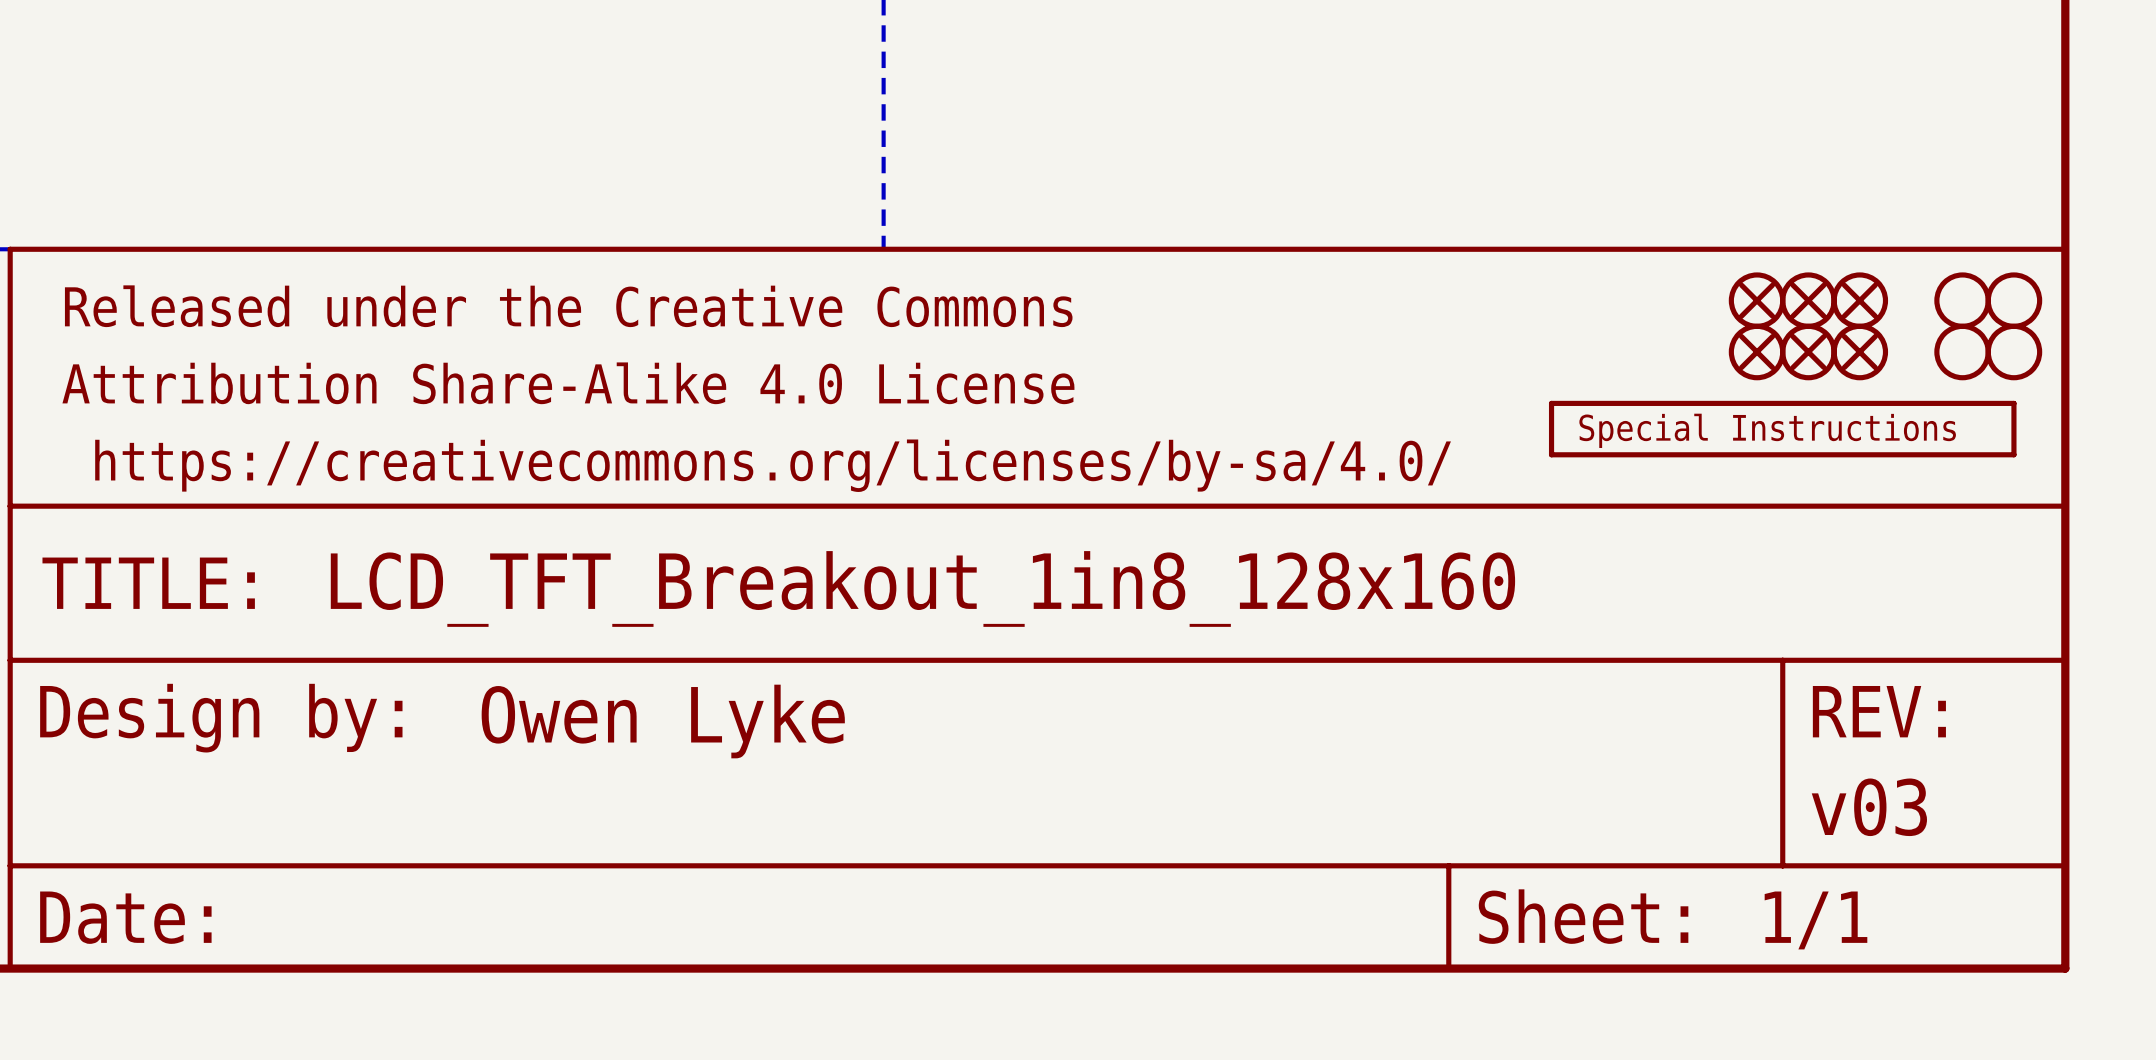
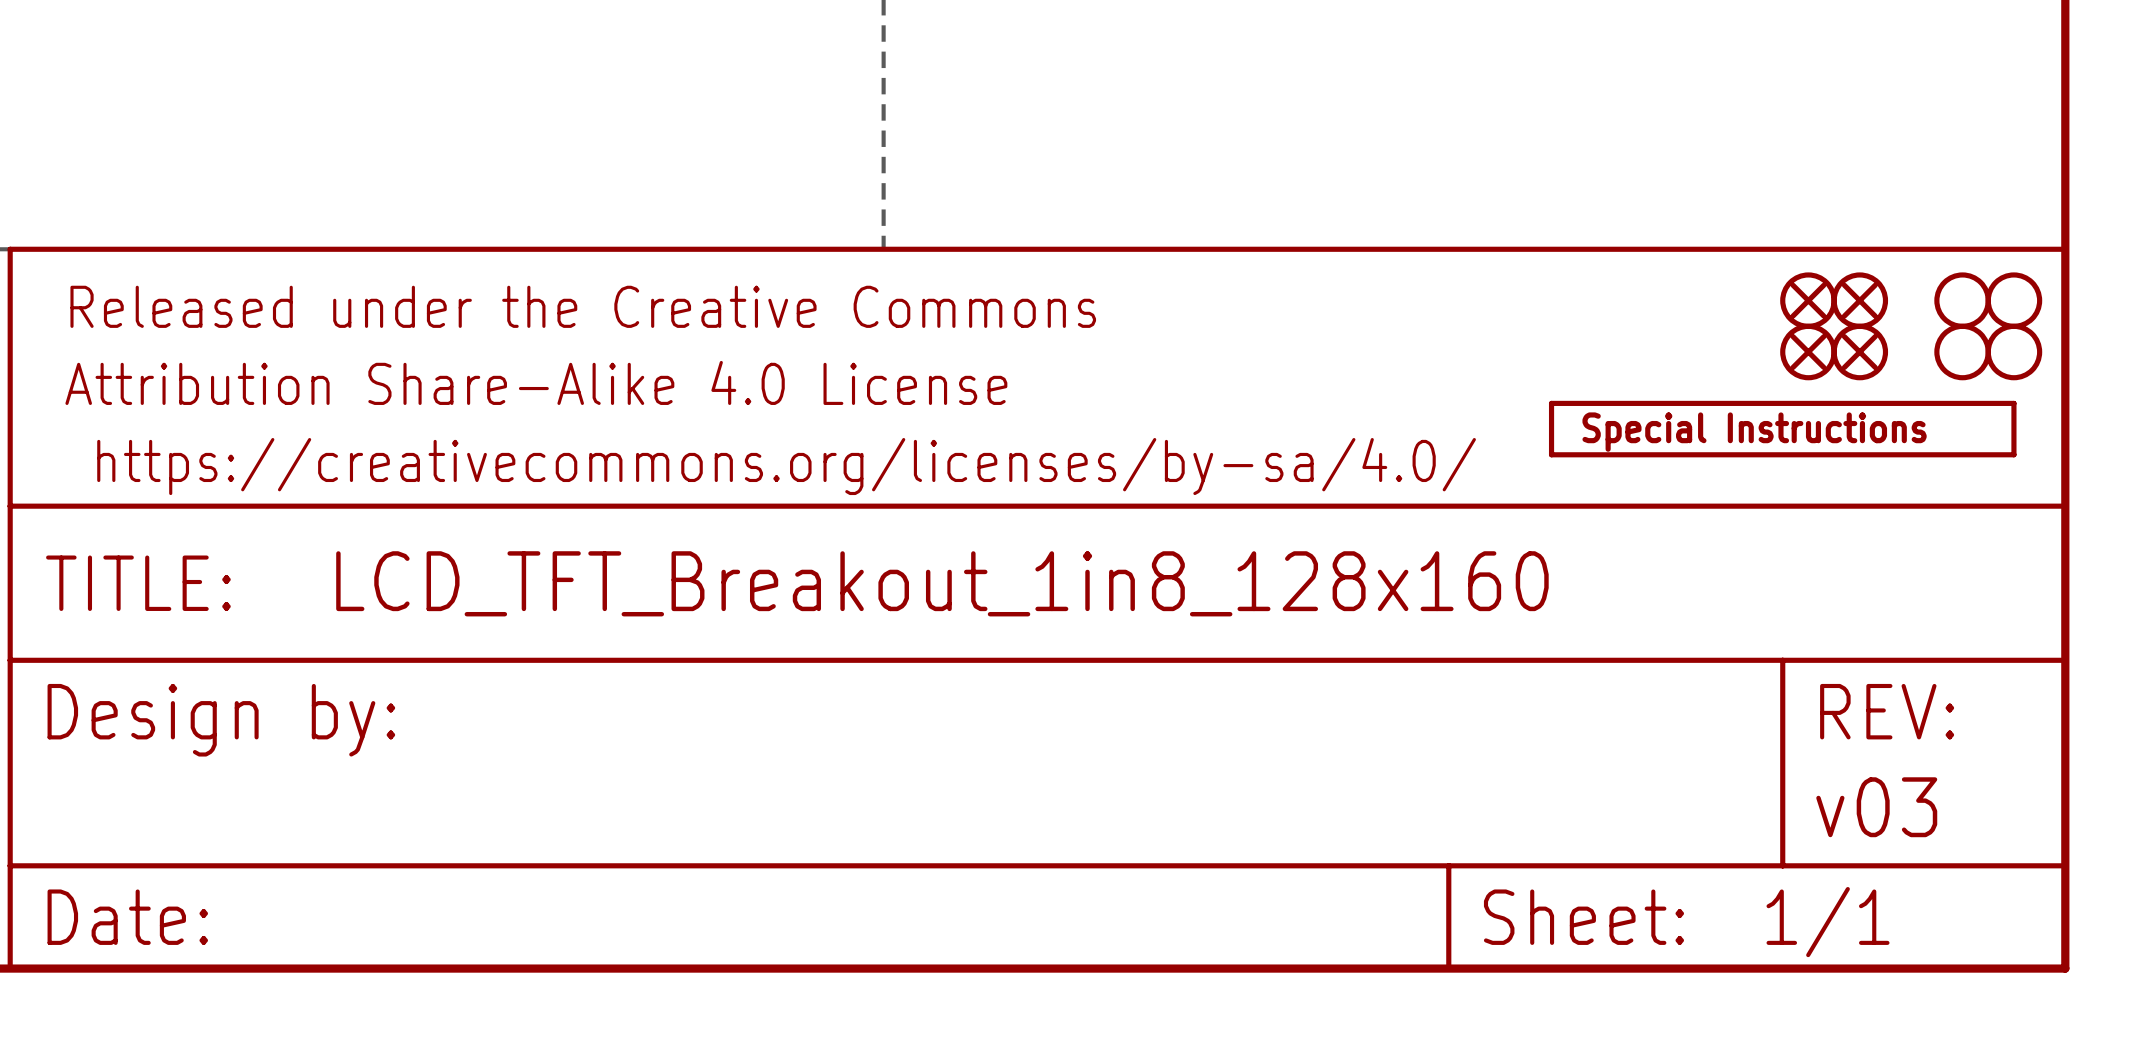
part: (1757, 300) -> none
part: (1757, 352) -> none
part text: Owen Lyke (663, 721) -> none

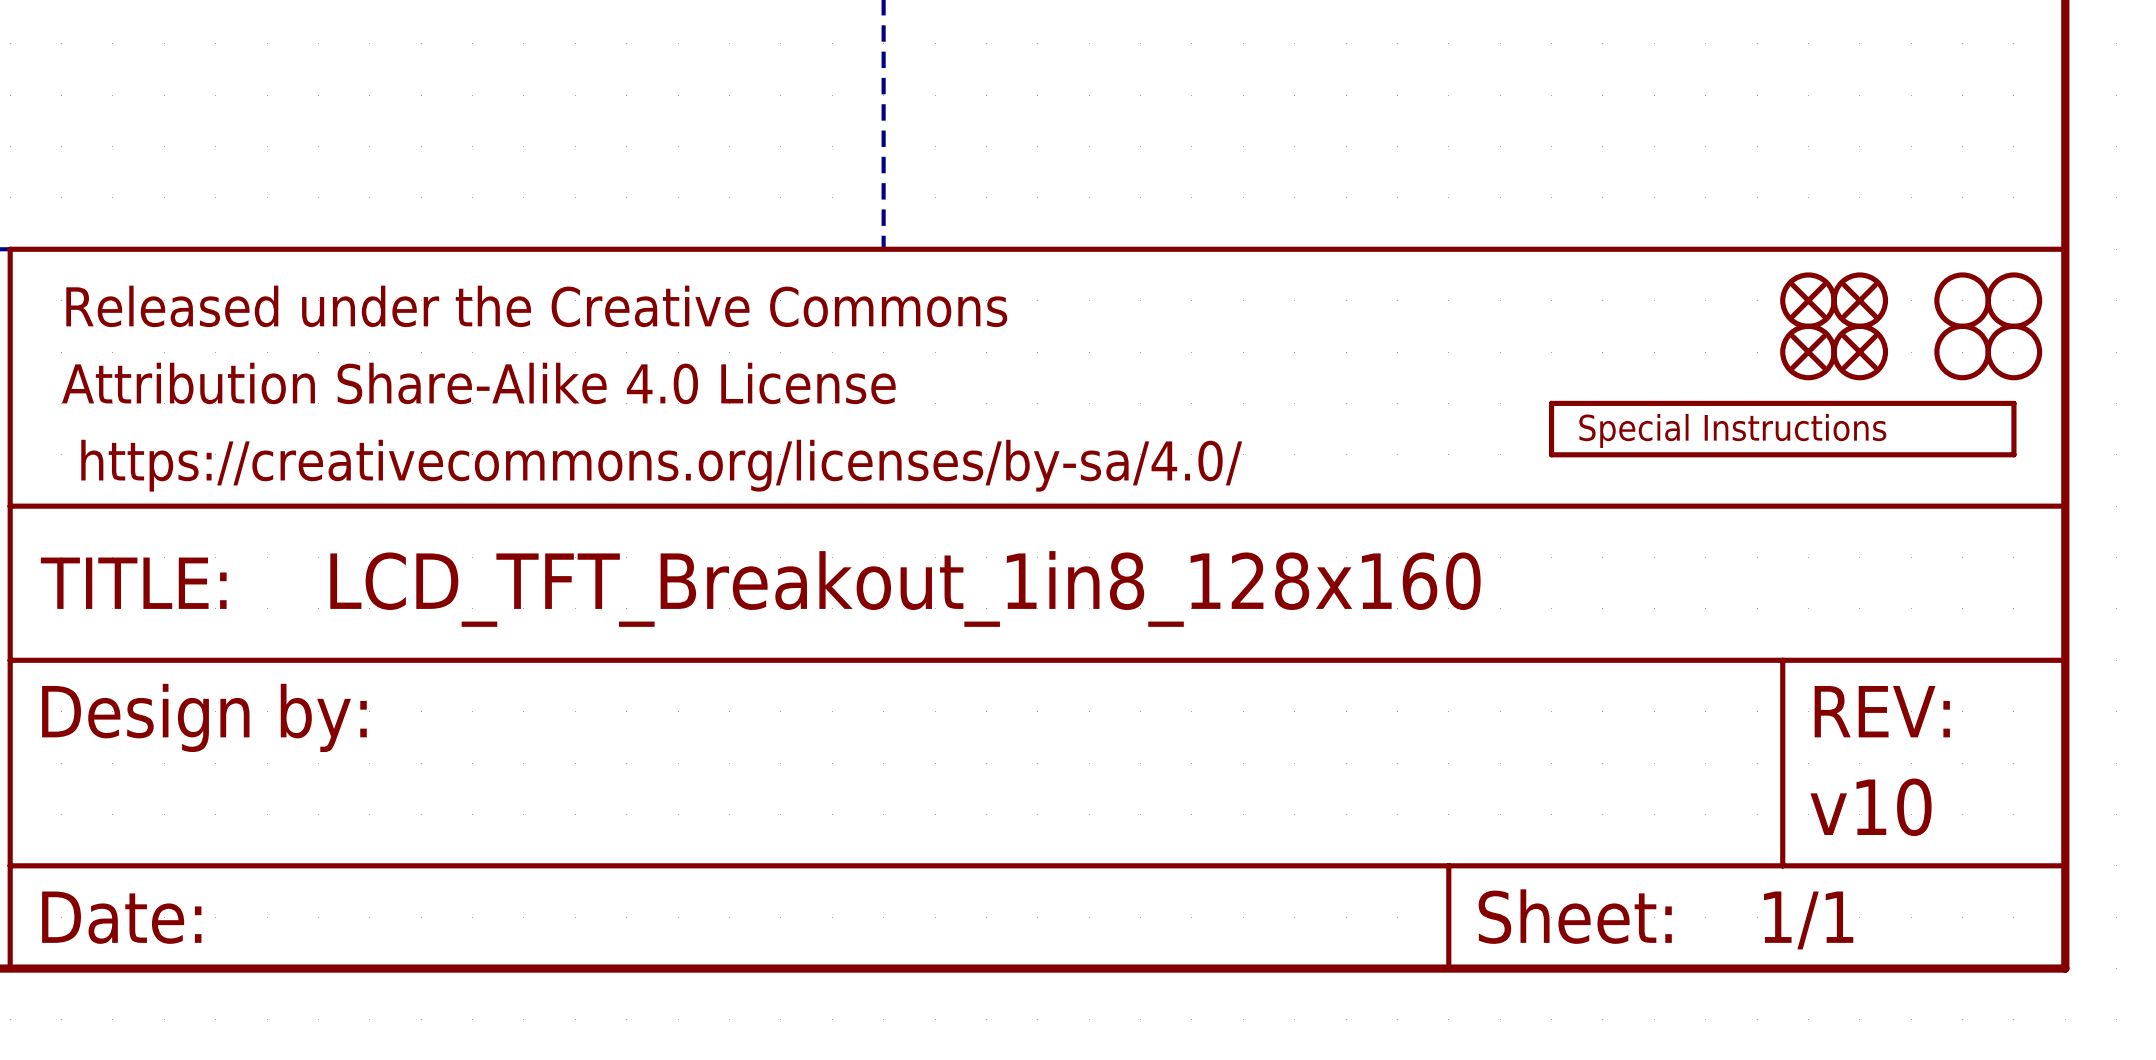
part text: v03 (1876, 807) -> v10 (1871, 807)

